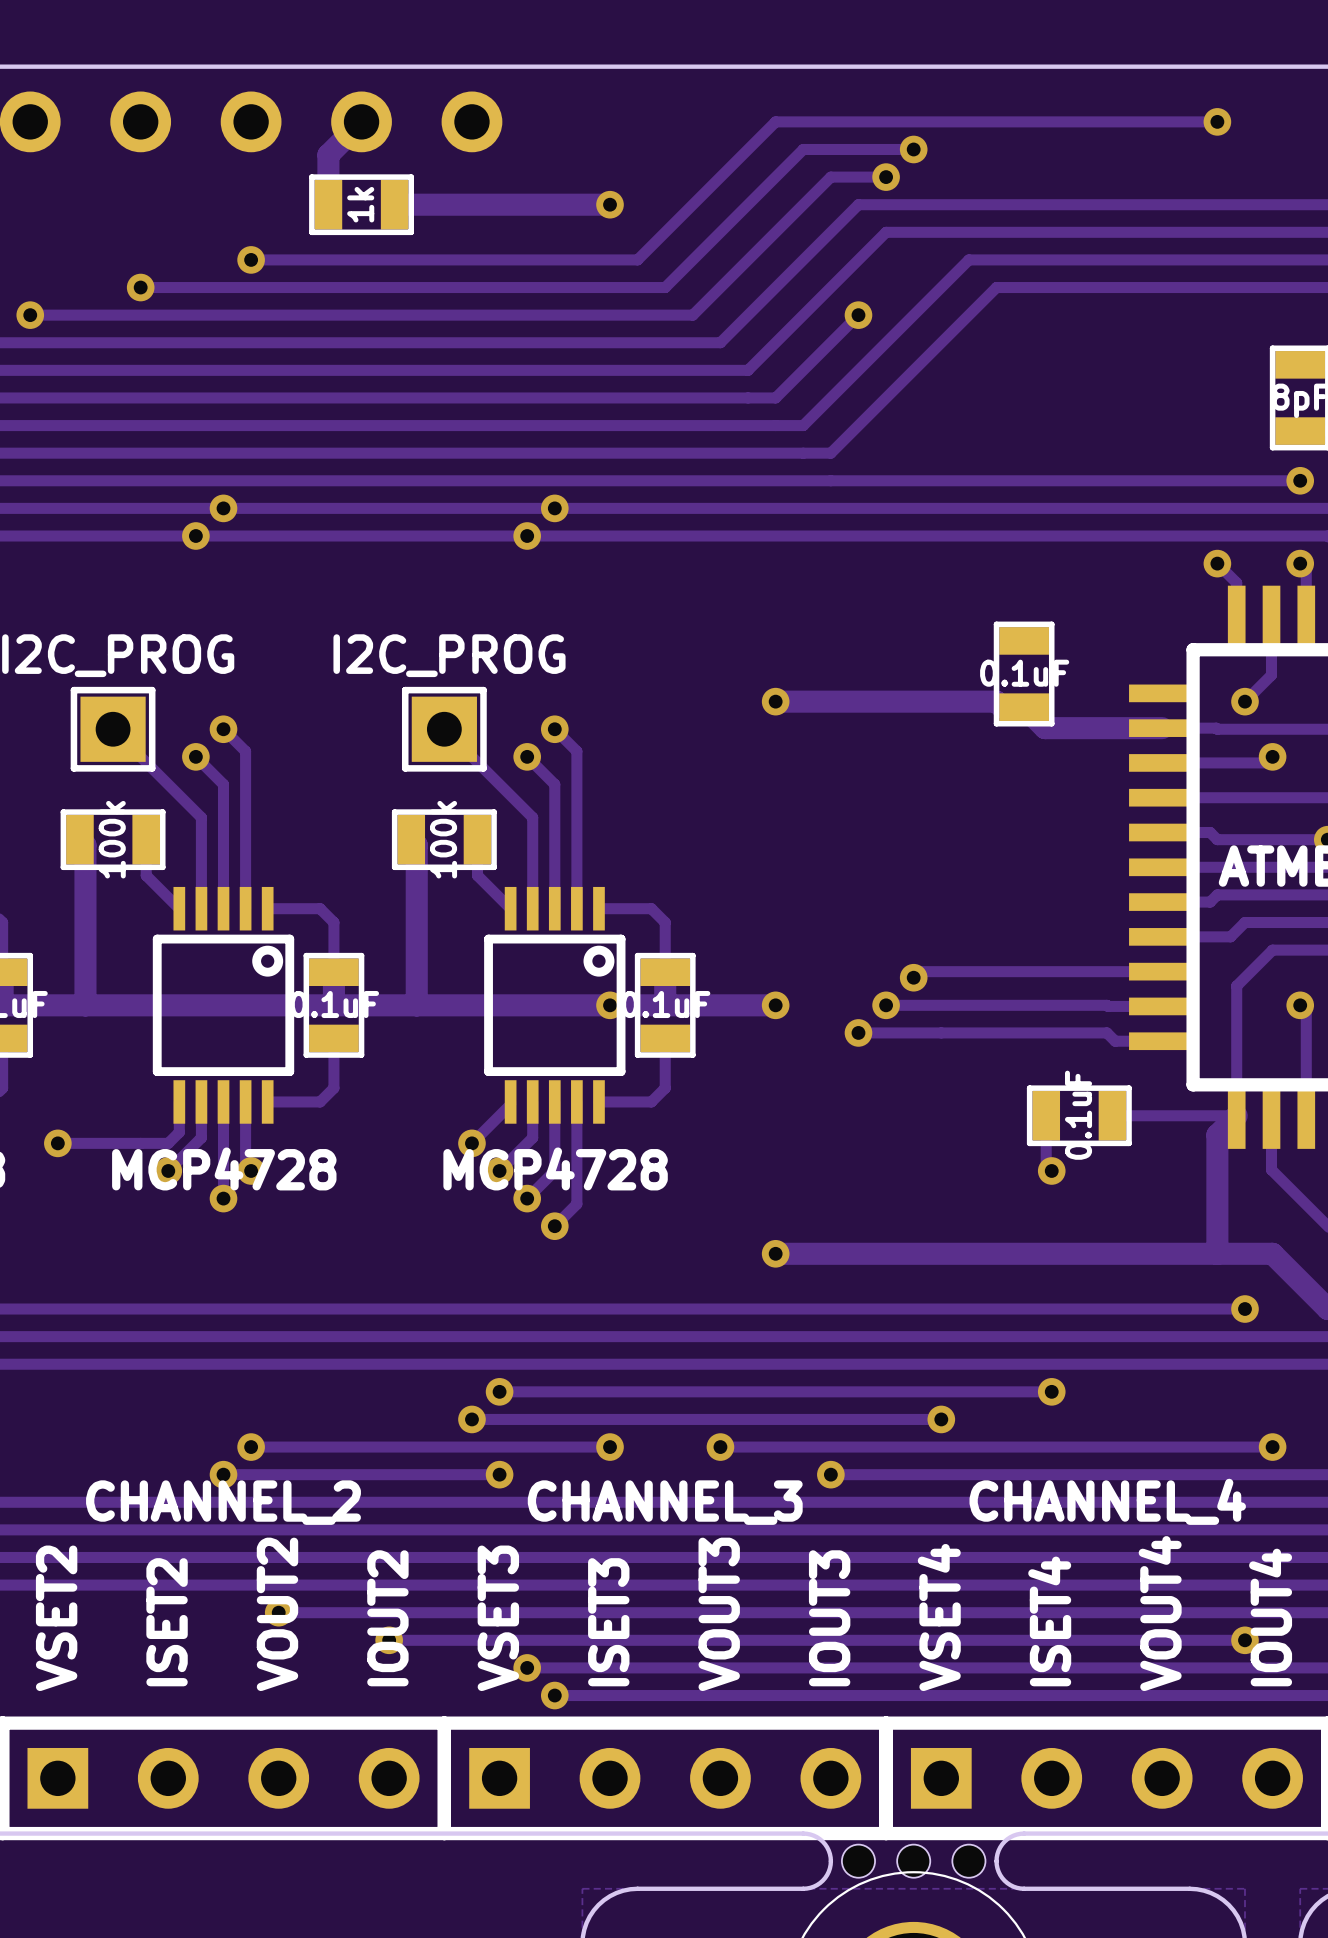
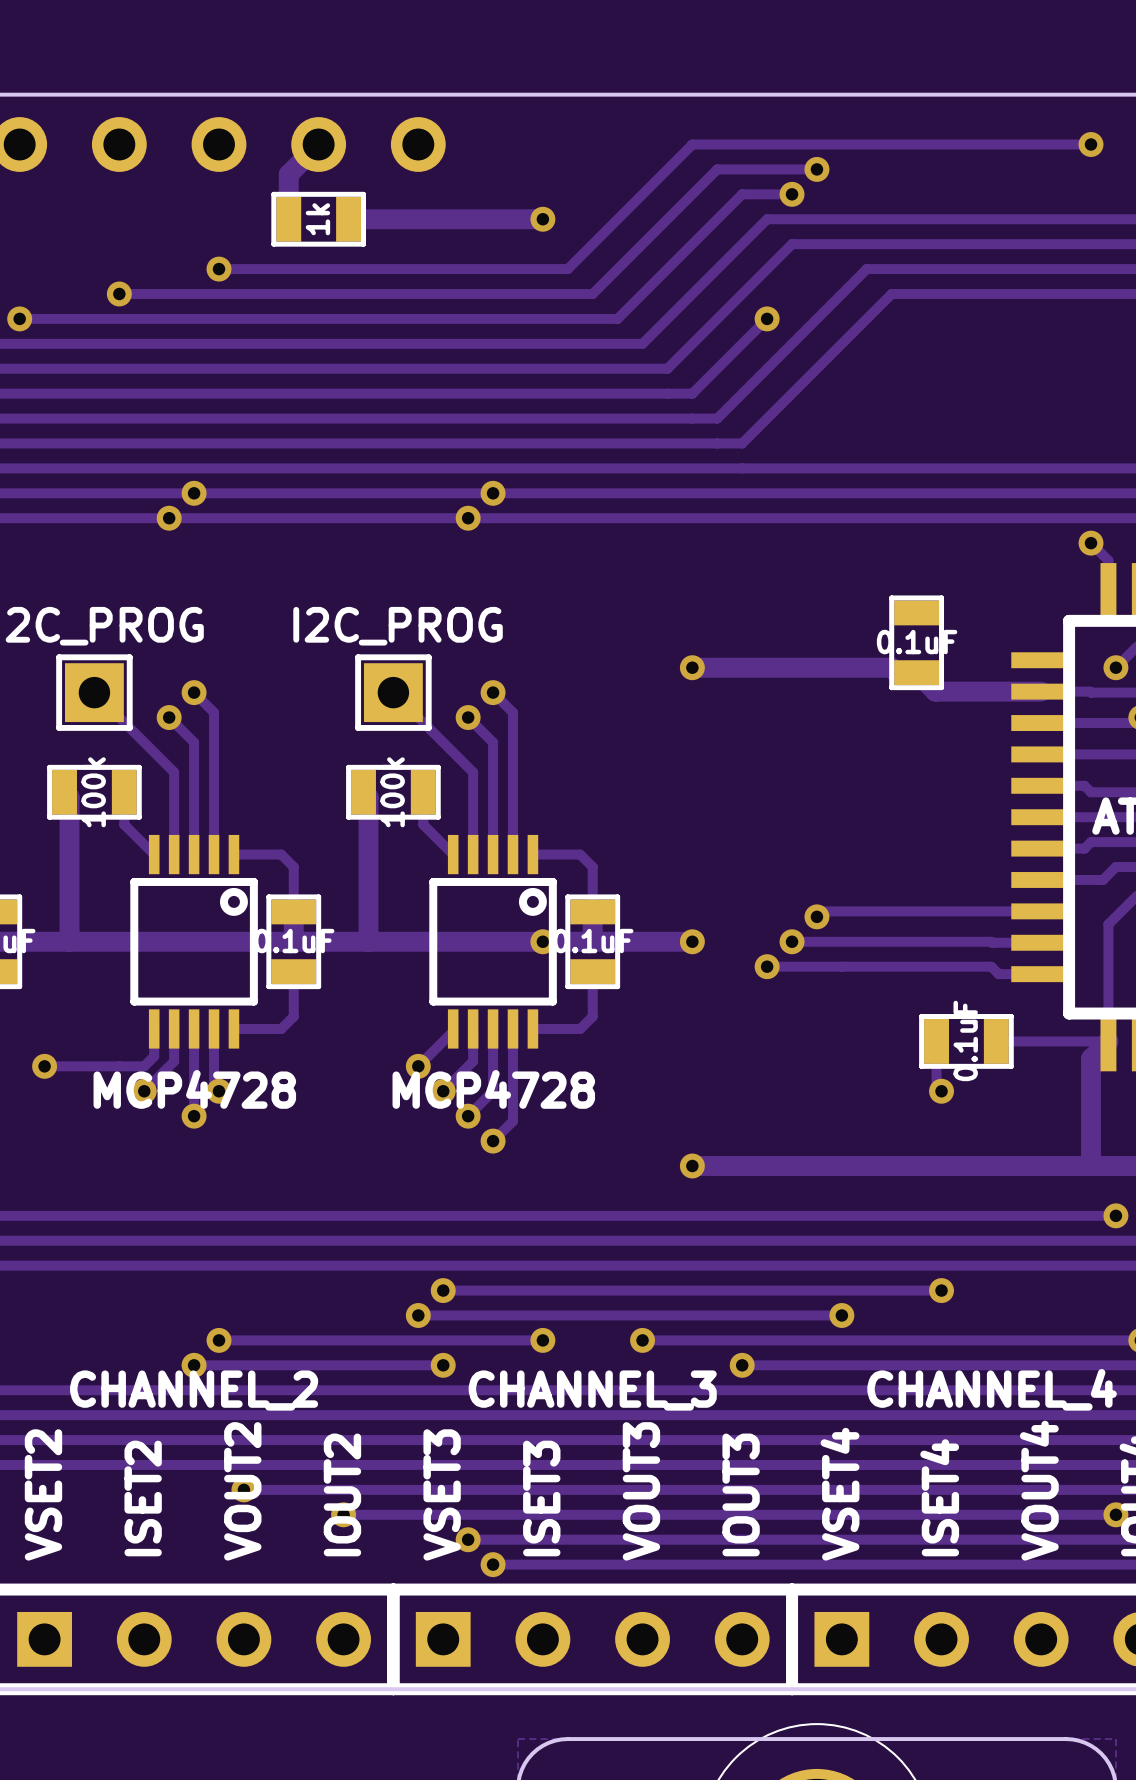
board edge: (803, 1833) (813, 1835) (822, 1841) (828, 1850) (830, 1861) -> (717, 1689) (916, 1689)
board edge: (1024, 1833) (1013, 1835) (1004, 1841) (998, 1850) (996, 1861) -> none
board edge: (830, 1861) (828, 1871) (822, 1880) (813, 1886) (803, 1888) -> (916, 1739) (717, 1739)
part: (913, 1861) -> none
board edge: (996, 1861) (998, 1871) (1004, 1880) (1013, 1886) (1024, 1888) -> none

